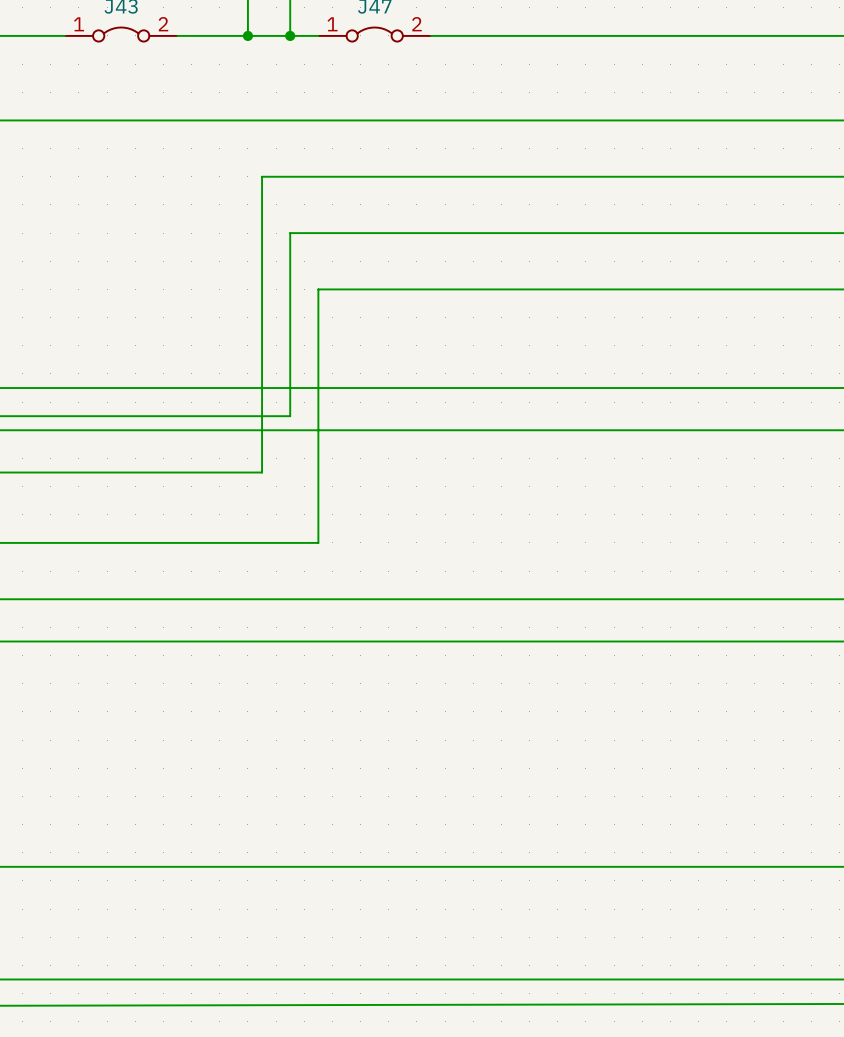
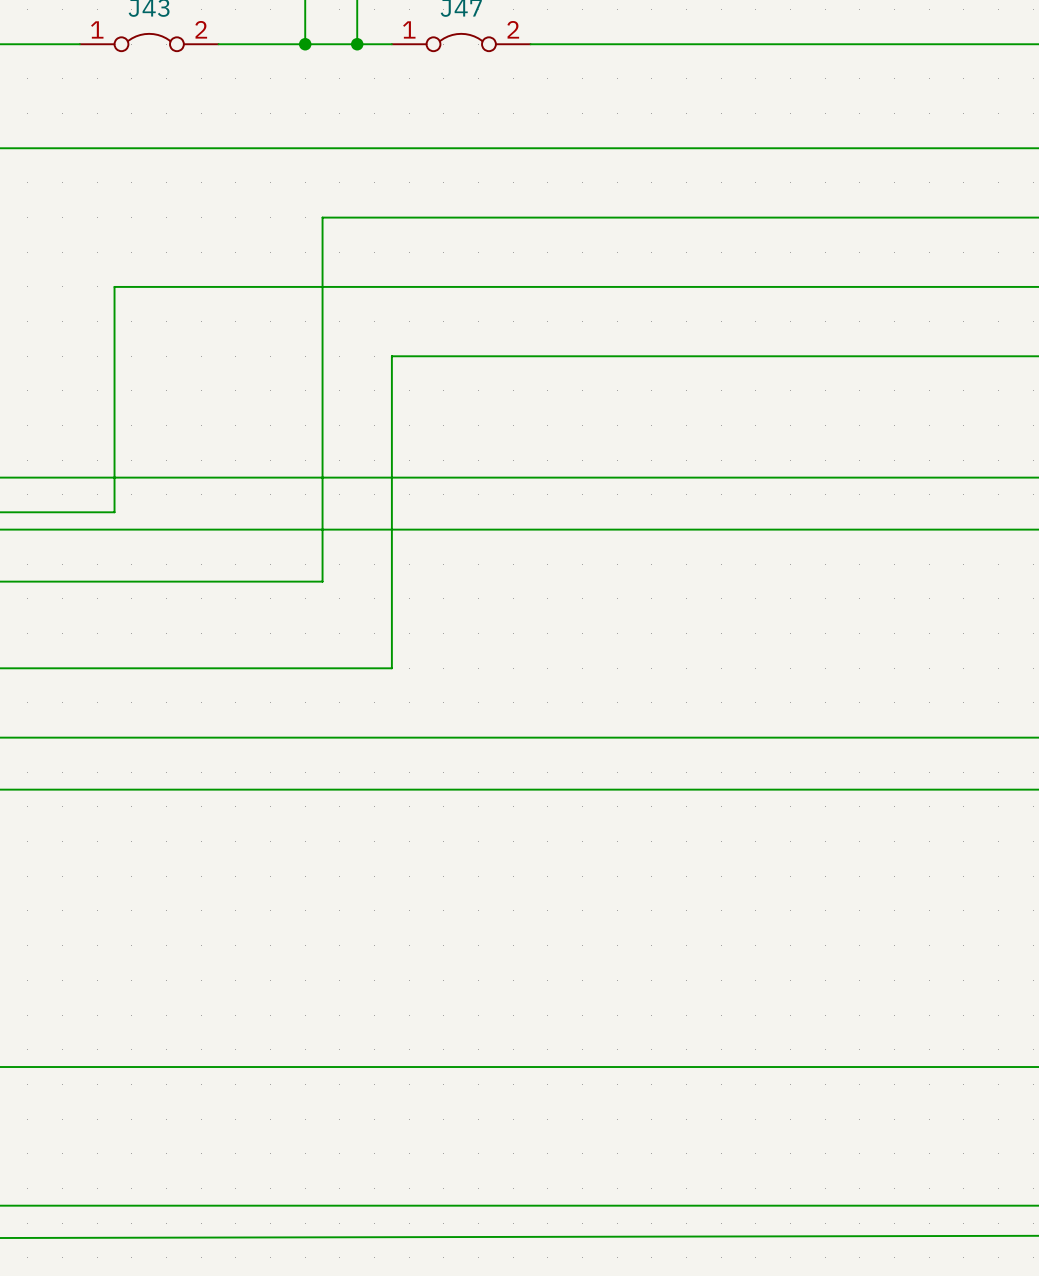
wire: (290, 233) (290, 416) (93, 416) -> (357, 286) (114, 286) (114, 512)

